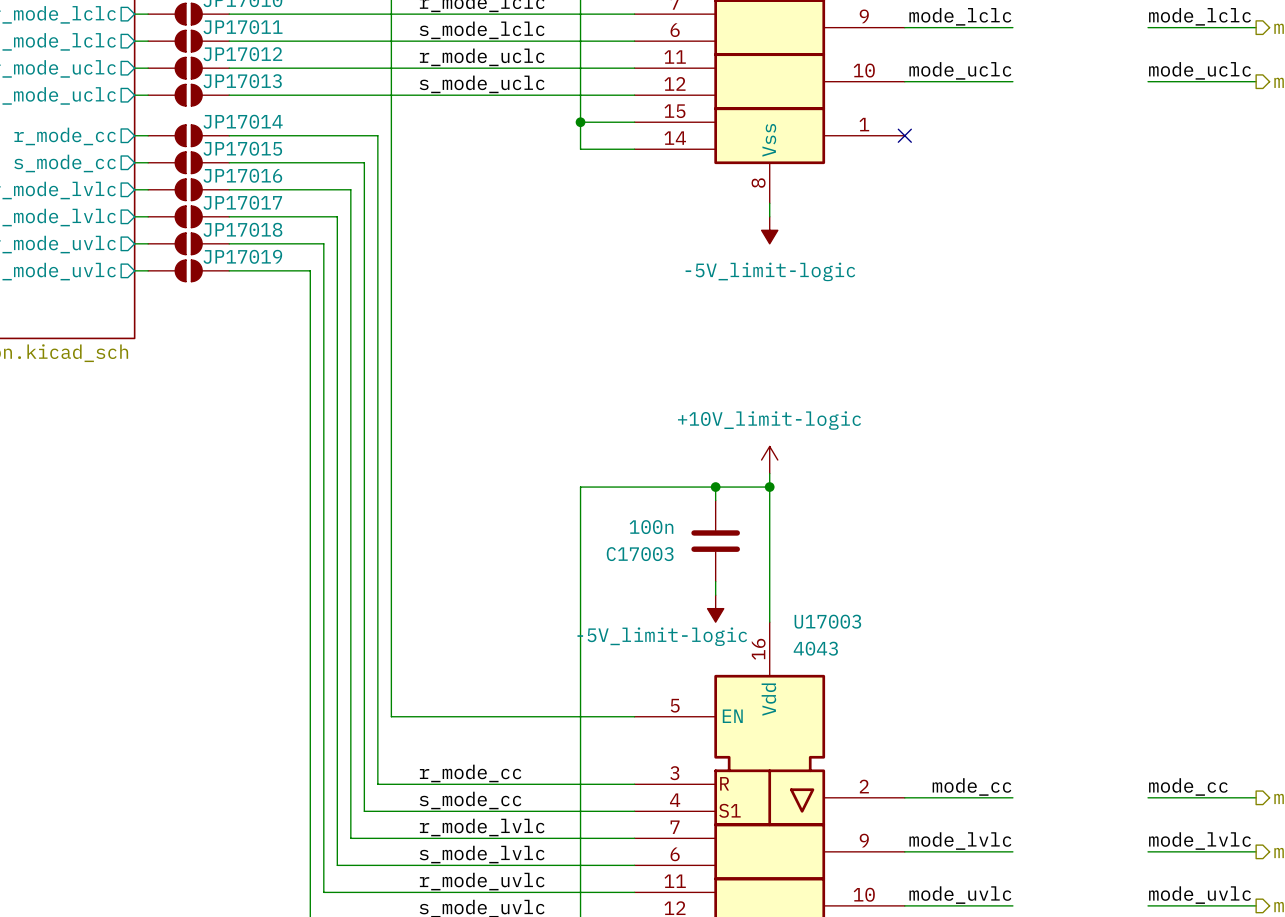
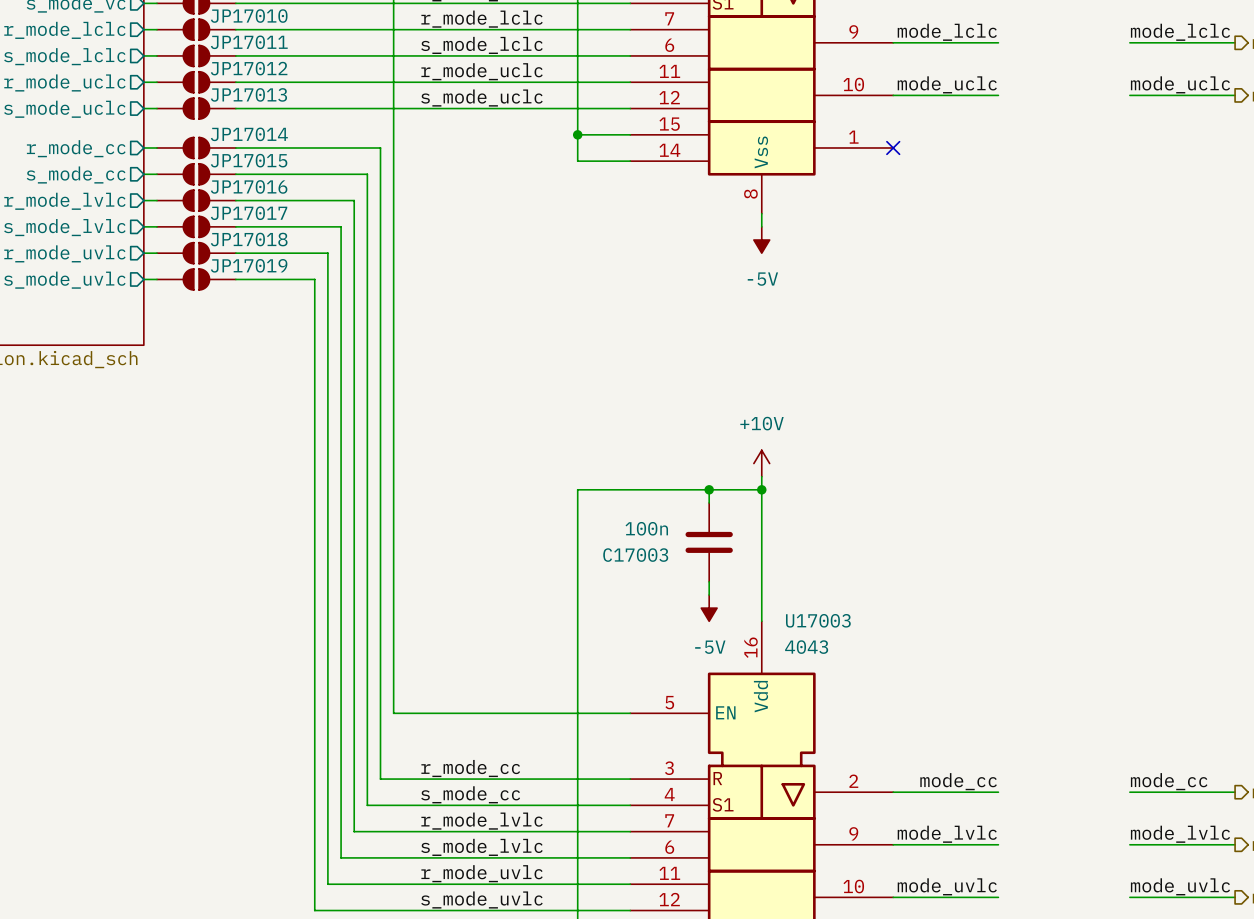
power symbol: -5V_limit-logic (769, 230) -> -5V (761, 240)
power symbol: +10V_limit-logic (769, 460) -> +10V (761, 463)
power symbol: -5V_limit-logic (715, 608) -> -5V (709, 608)

